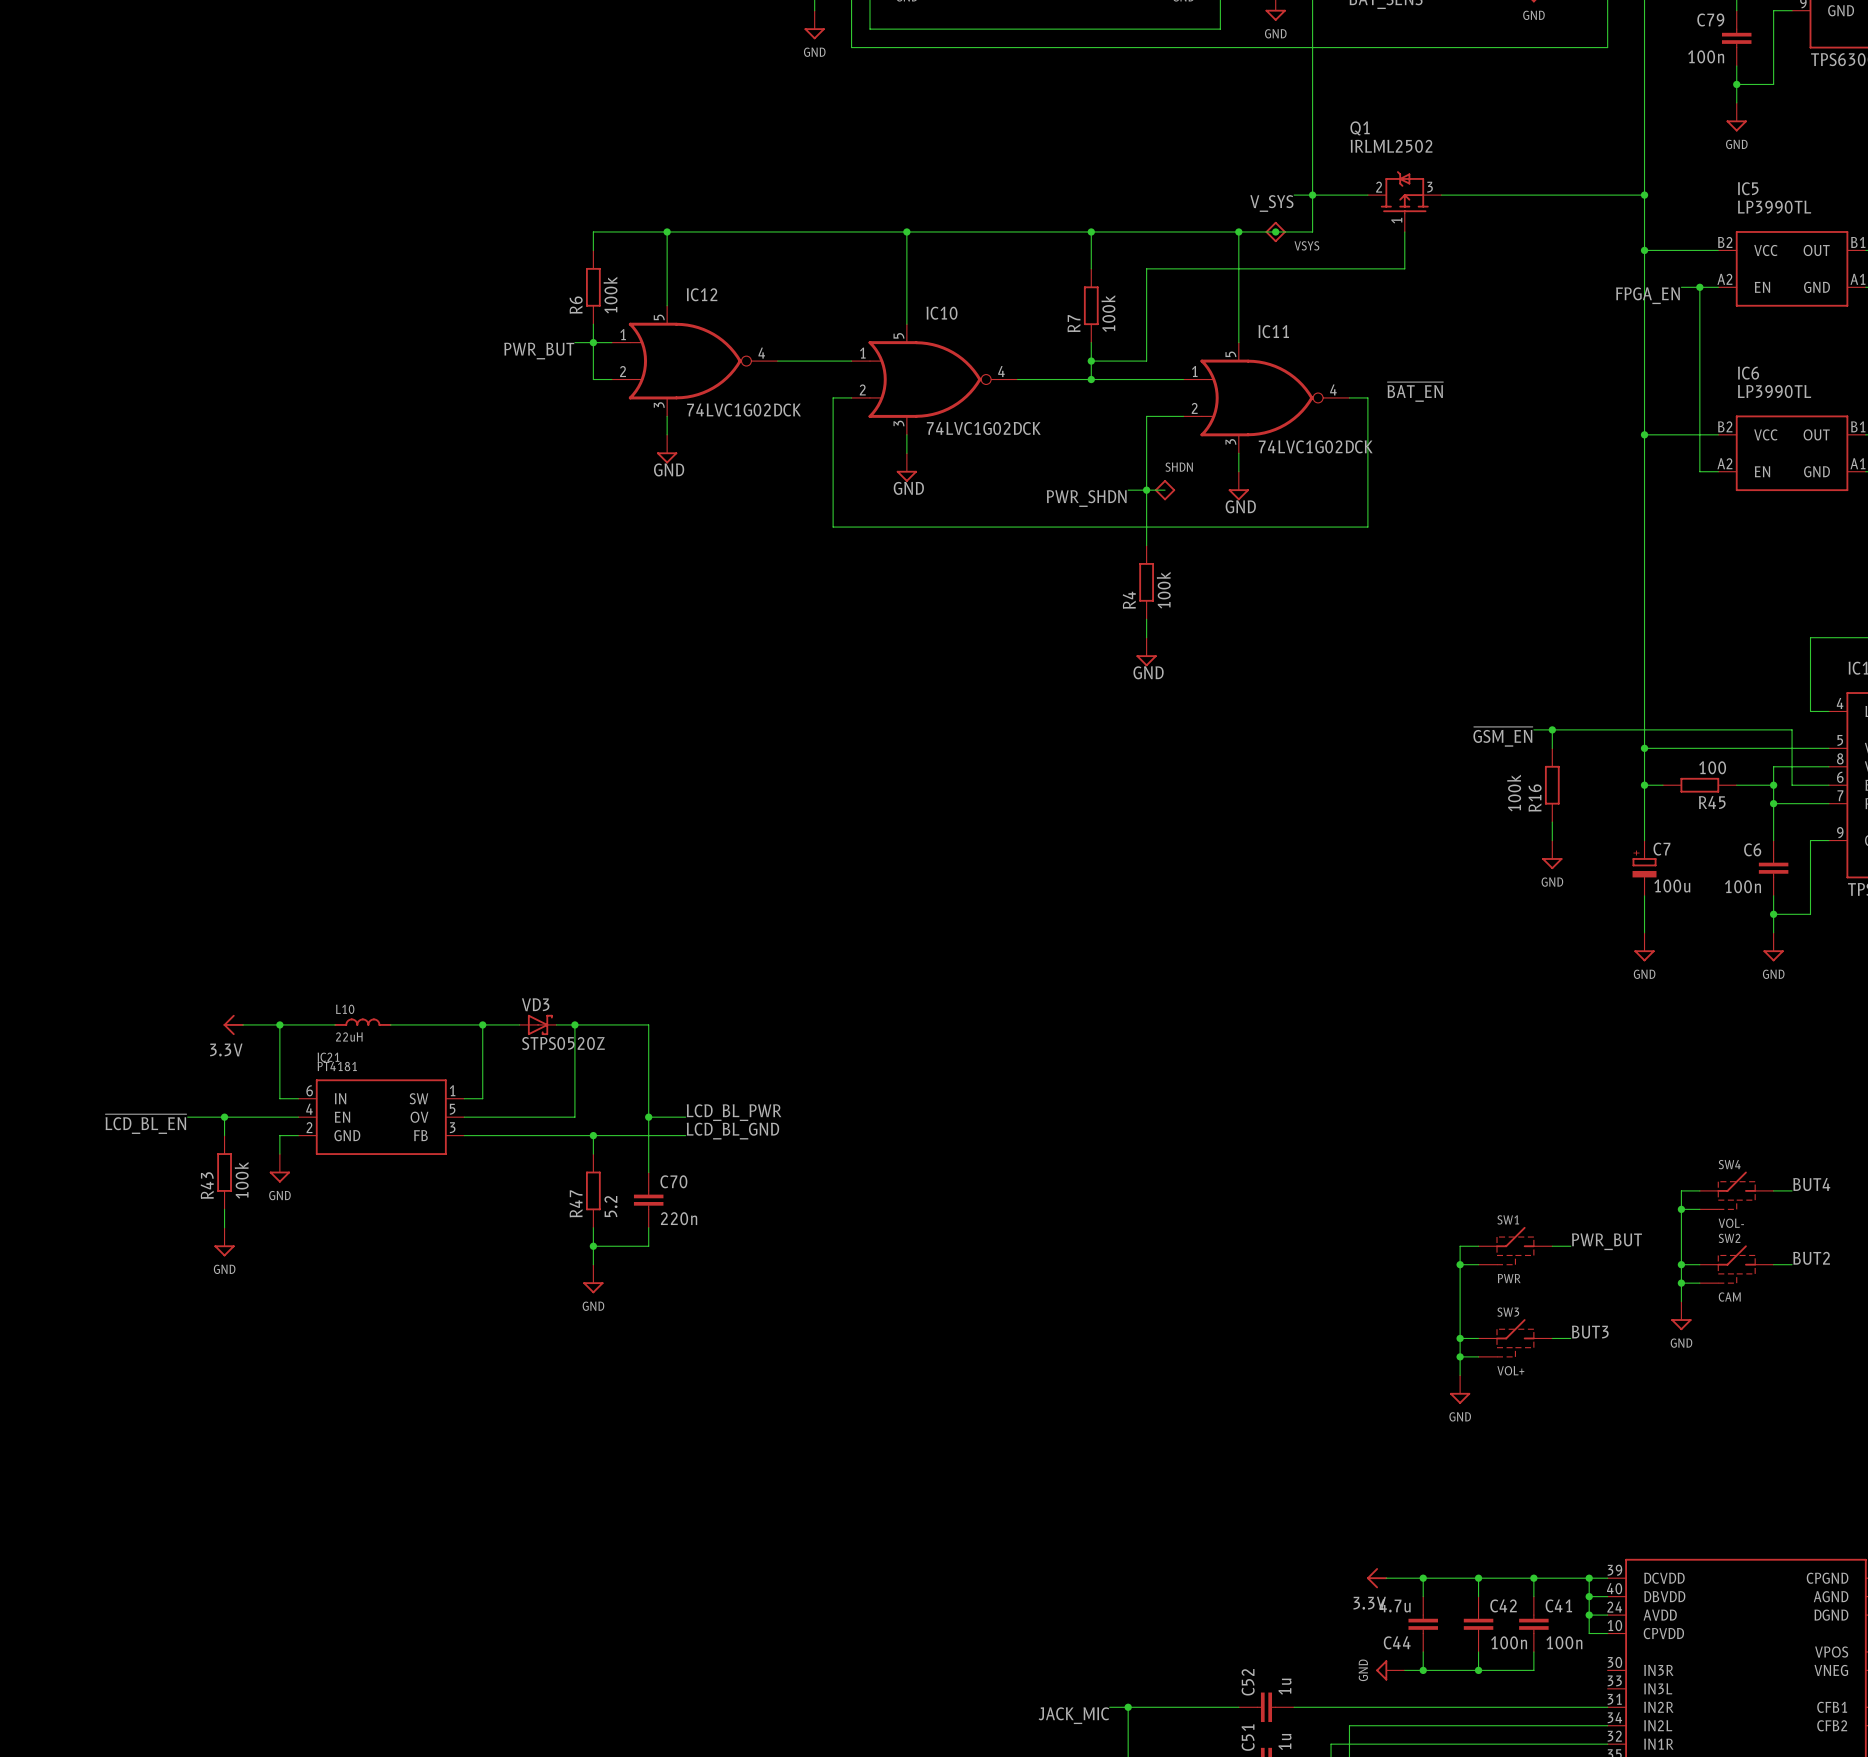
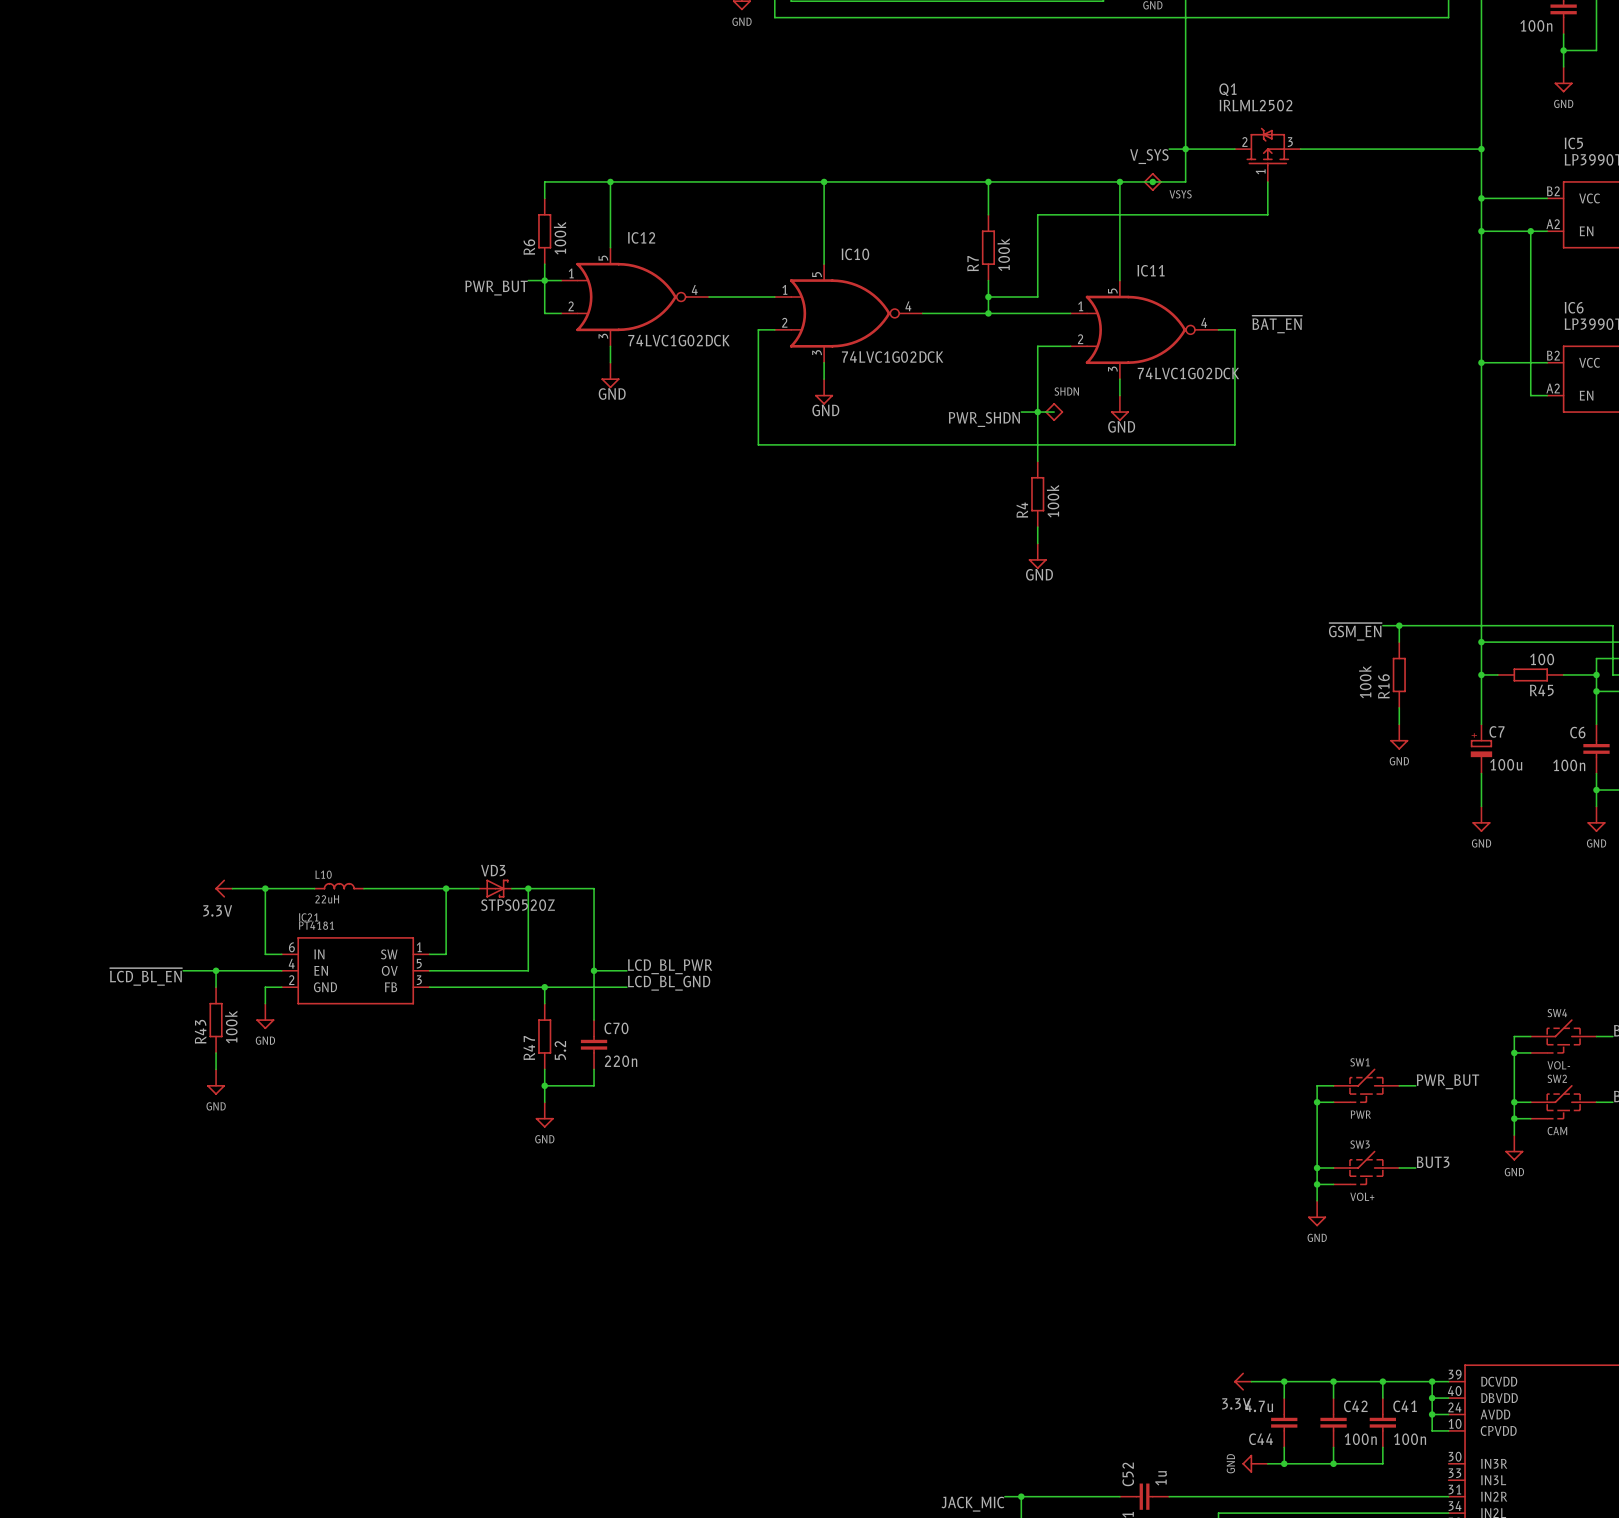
wire: none -> (1481, 231) (1514, 231)
junction: none -> (1481, 231)
label: FPGA_EN (1647, 295) -> none

